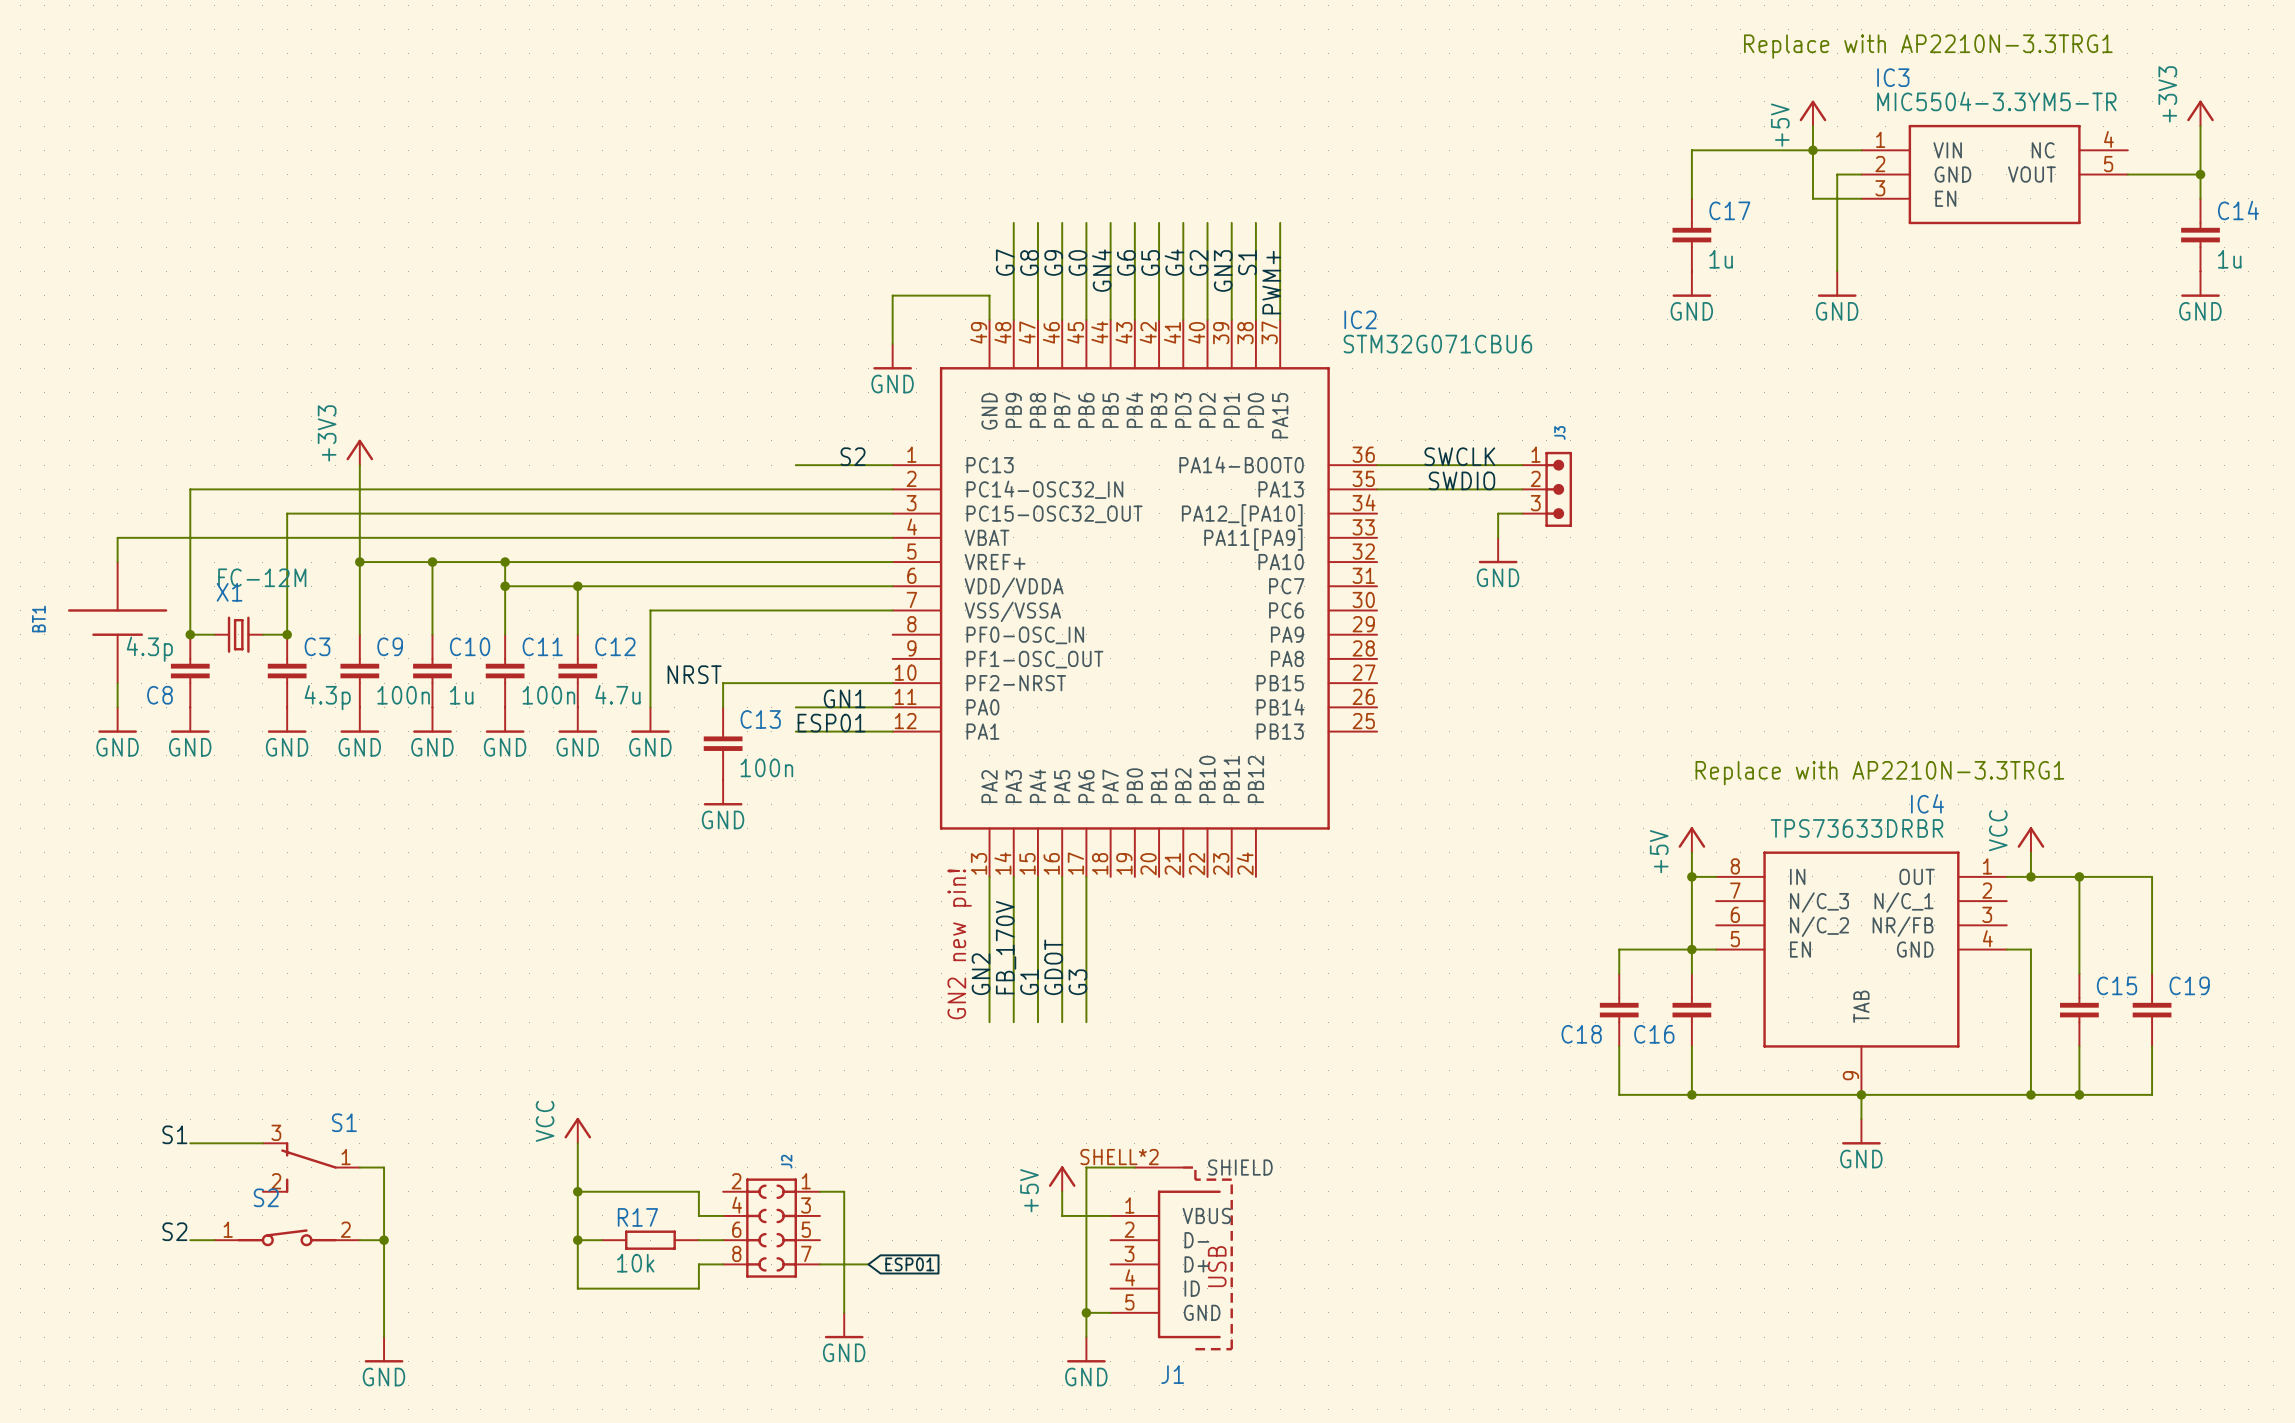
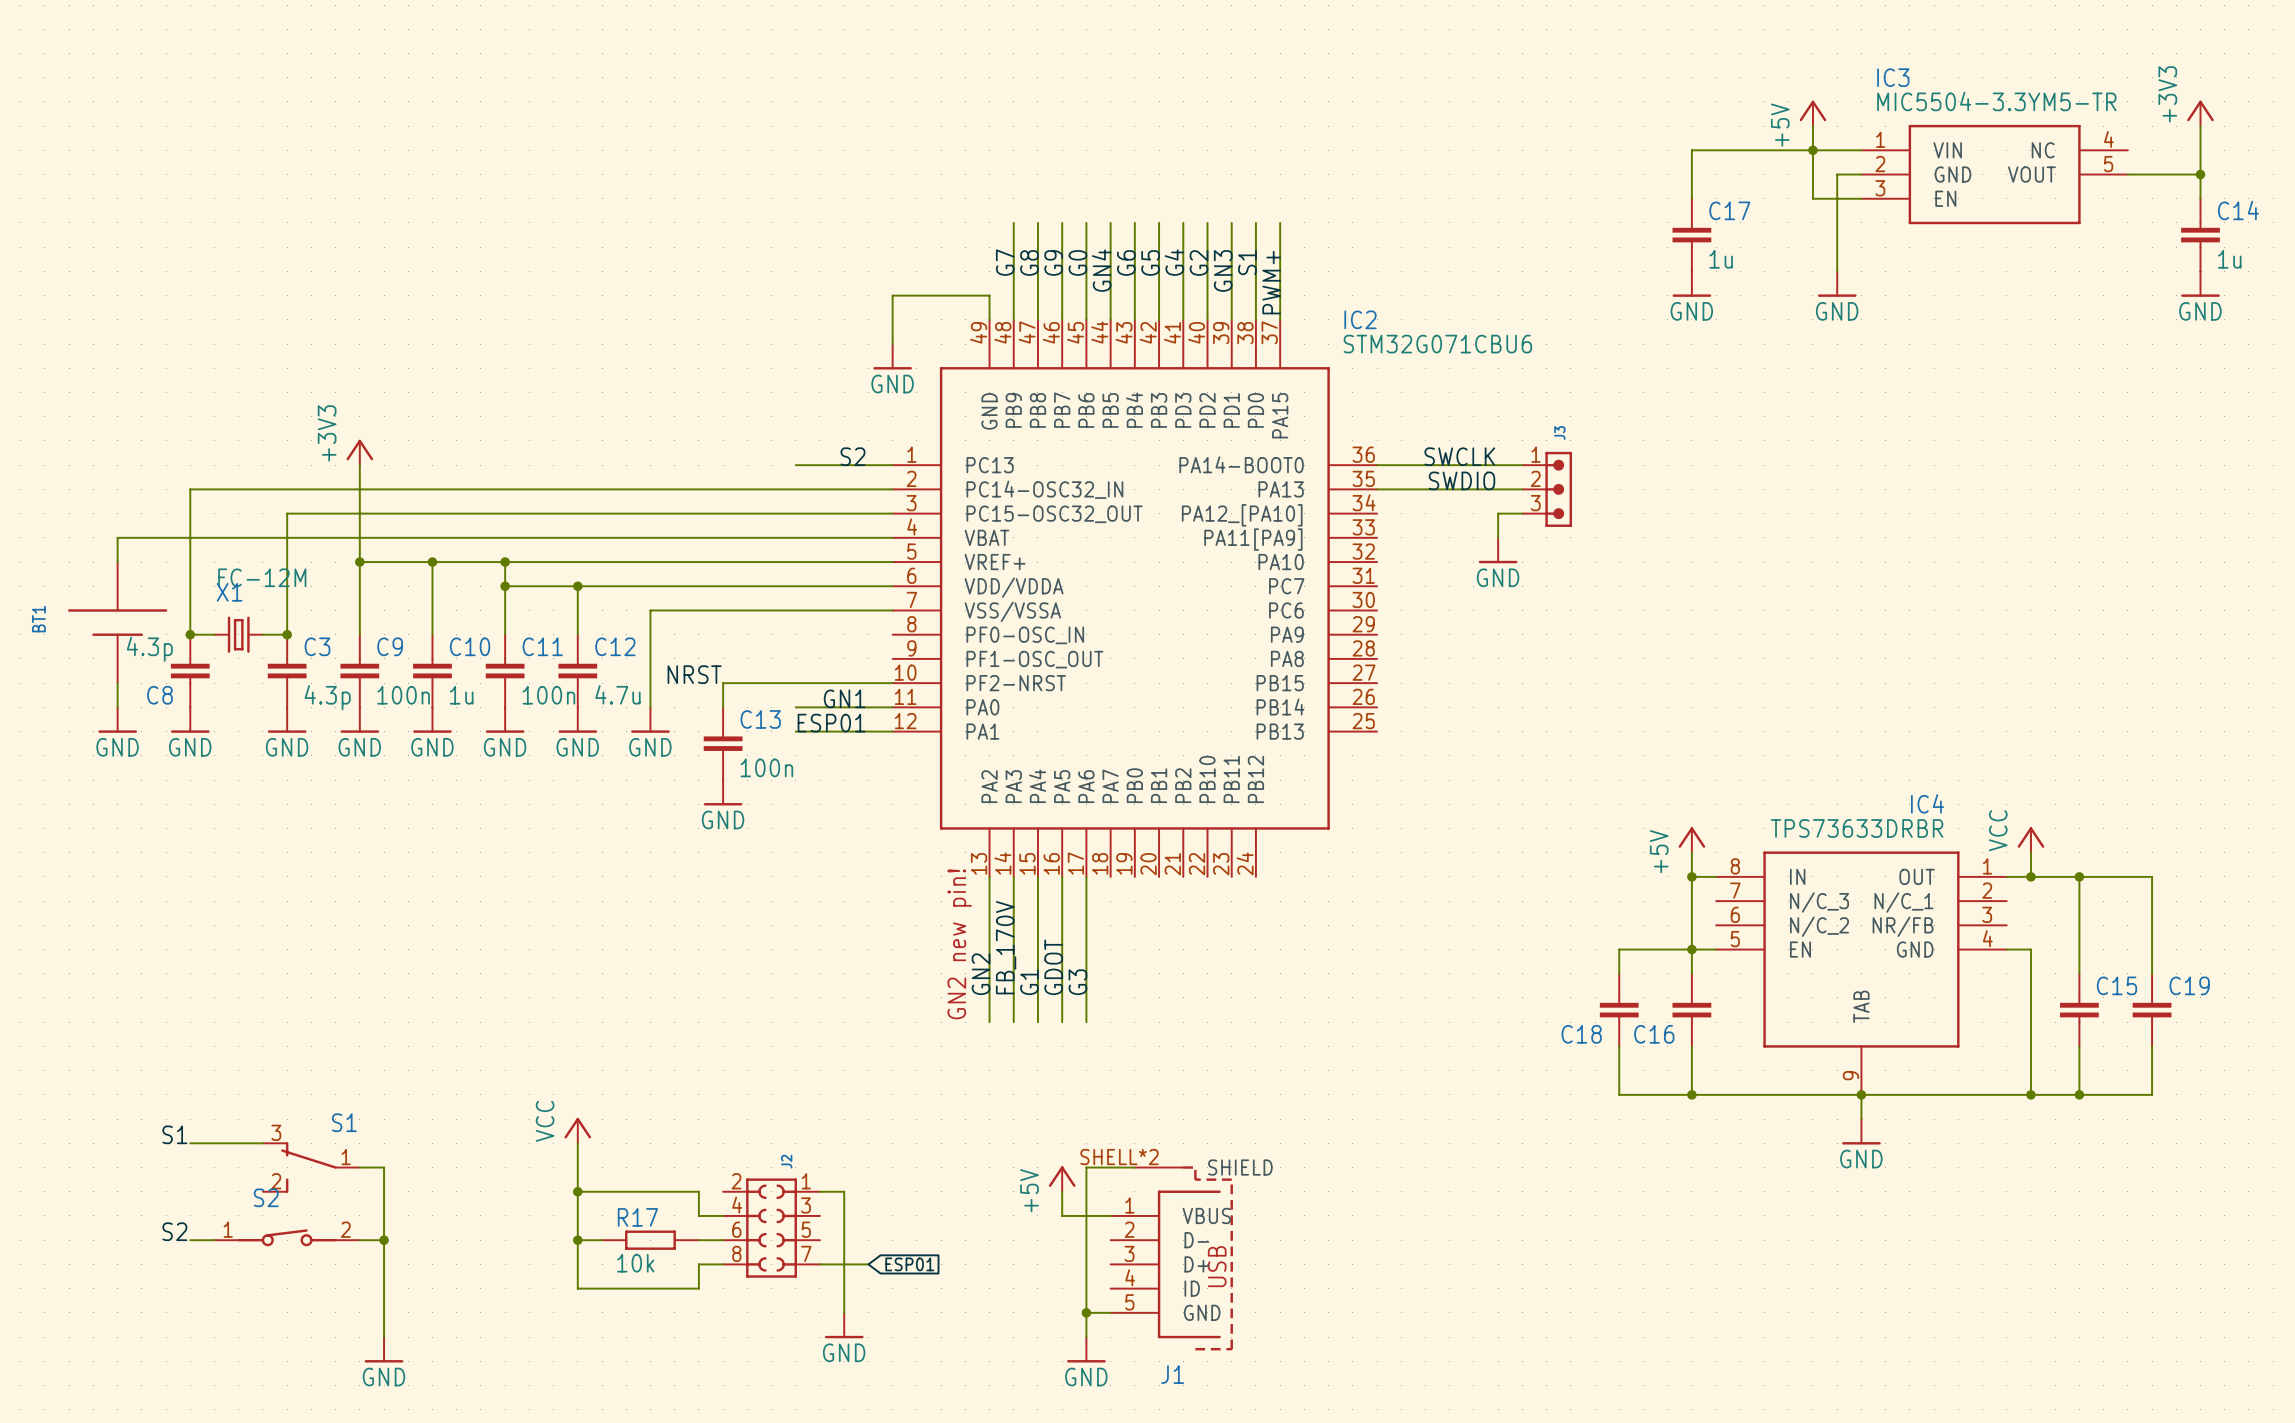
text: Replace with AP2210N-3.3TRG1 (1928, 46) -> none
text: Replace with AP2210N-3.3TRG1 (1879, 773) -> none

